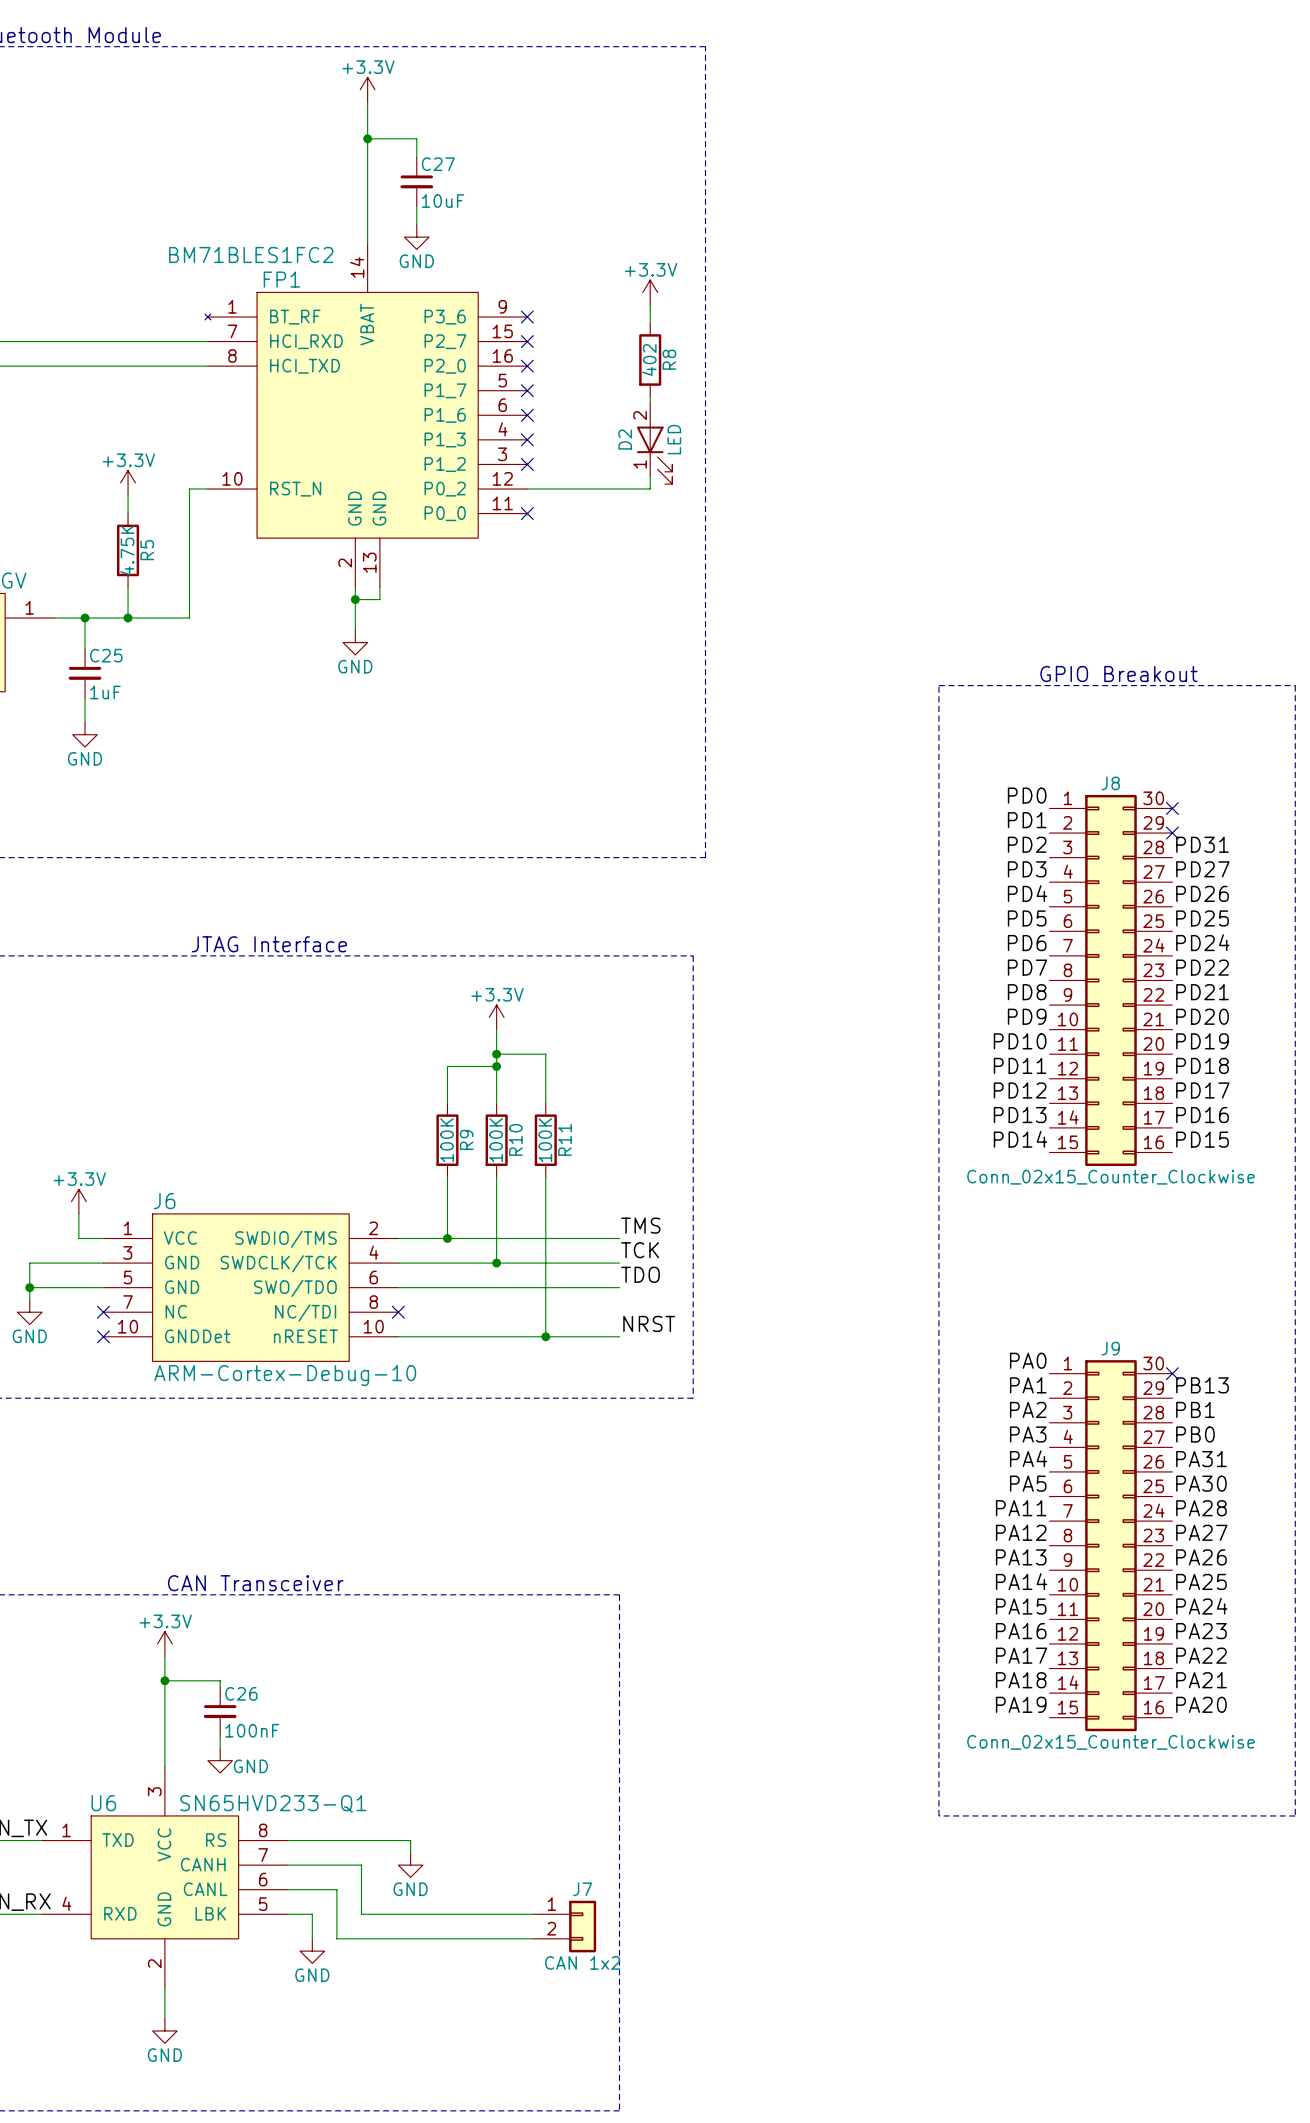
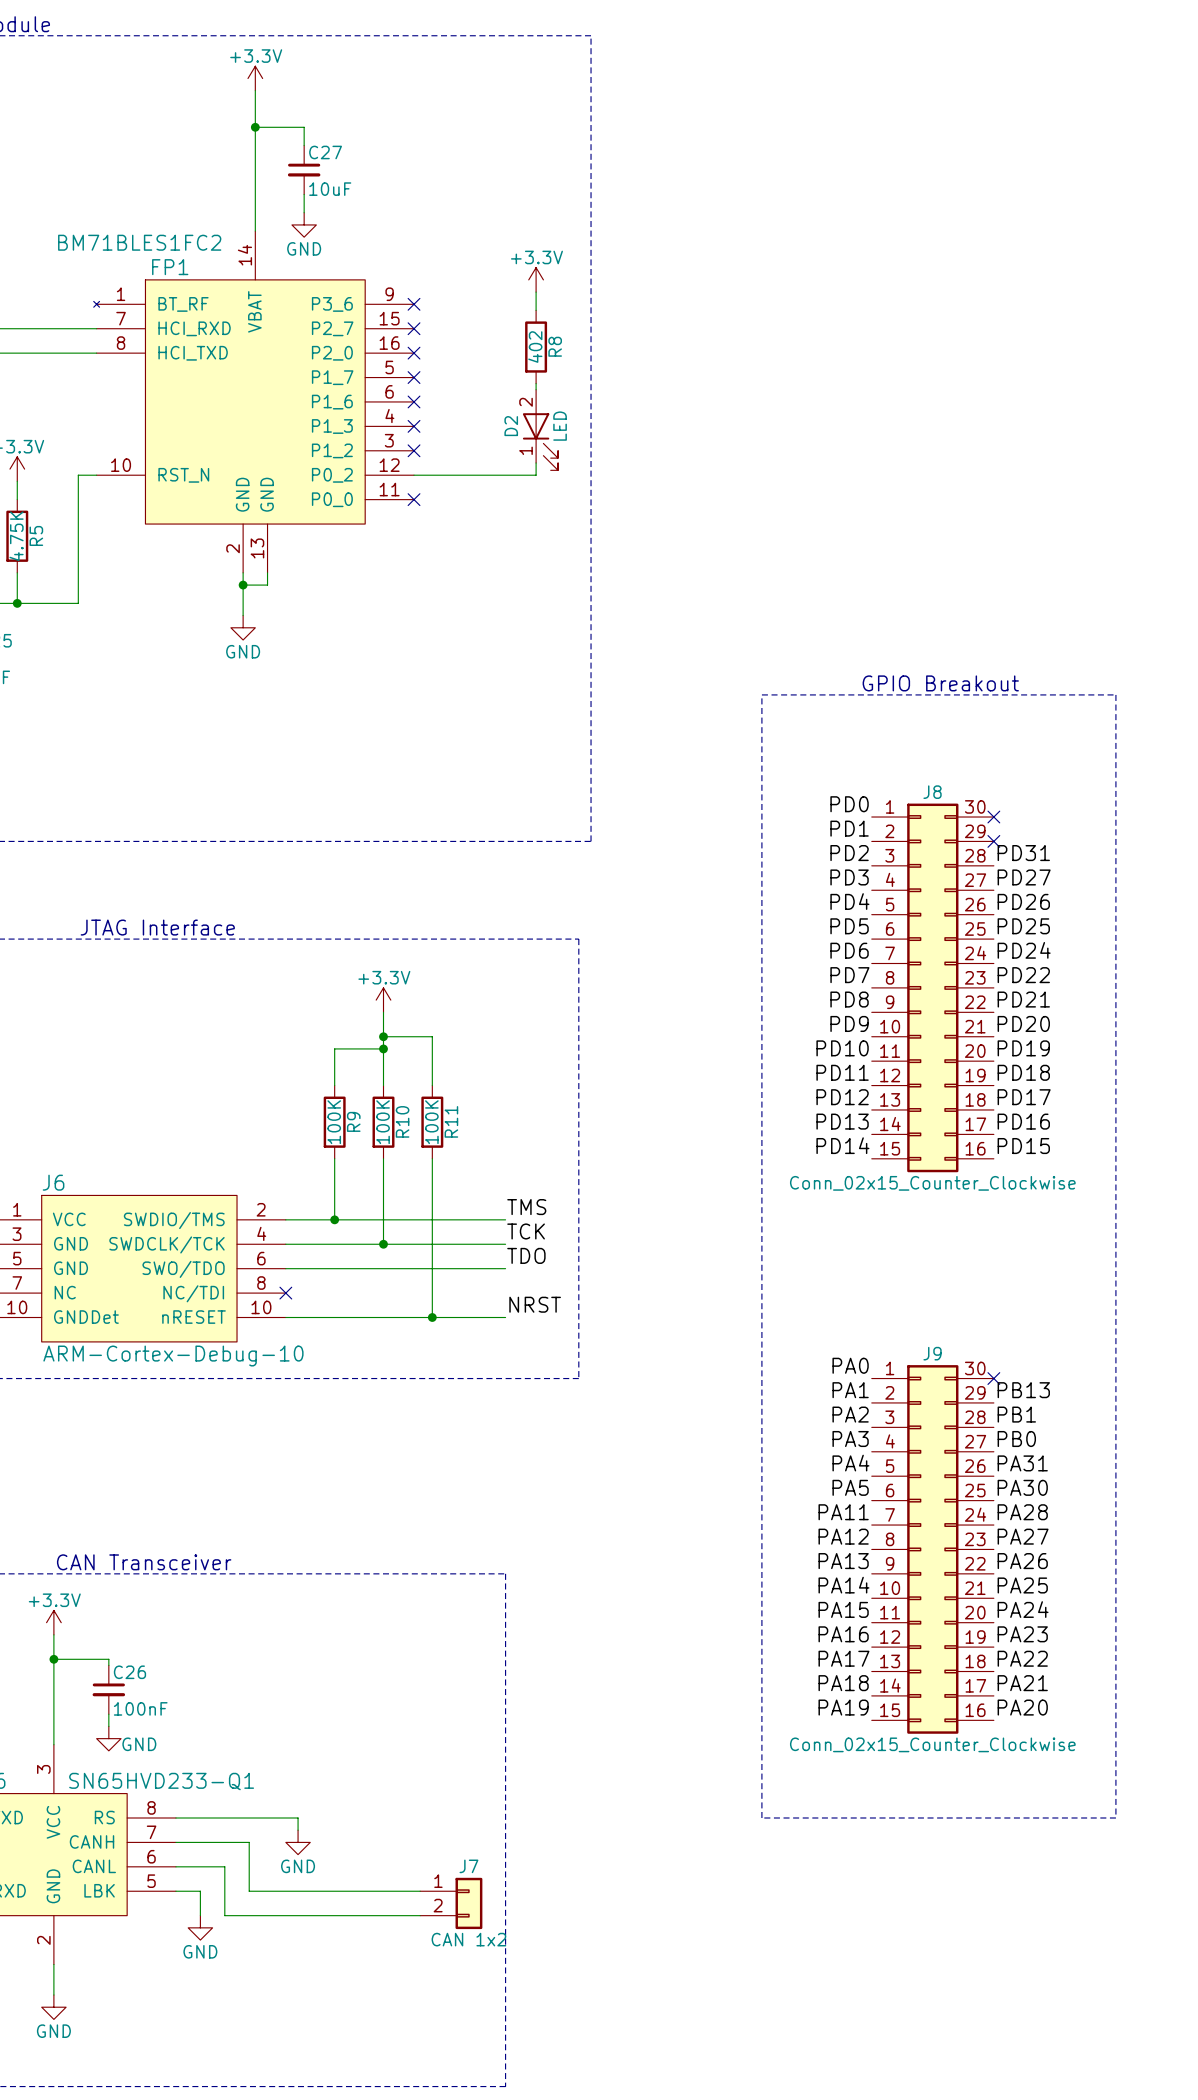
text position: GPIO Breakout (1118, 673) -> GPIO Breakout (940, 683)
line: (938, 685) (1295, 685) (1295, 1815) (938, 1815) (938, 685) -> (761, 694) (1115, 694) (1115, 1818) (761, 1818) (761, 694)
label position: PD0 (1027, 795) -> PD0 (849, 804)
no-connect mark: (1172, 808) -> none
label position: PD1 (1027, 820) -> PD1 (849, 828)
no-connect mark: none -> (993, 817)
no-connect mark: (1172, 833) -> none
label position: PD2 (1027, 844) -> PD2 (849, 853)
label position: PD31 (1202, 844) -> PD31 (1023, 853)
no-connect mark: none -> (993, 841)
label position: PD3 (1027, 869) -> PD3 (849, 877)
label position: PD27 (1202, 869) -> PD27 (1024, 877)
label position: PD4 (1027, 893) -> PD4 (849, 901)
label position: PD26 (1202, 893) -> PD26 (1023, 901)
label position: PD5 (1027, 918) -> PD5 (849, 926)
label position: PD25 (1202, 918) -> PD25 (1023, 926)
label position: PD24 (1202, 942) -> PD24 (1024, 950)
label position: PD6 (1027, 943) -> PD6 (849, 950)
label position: PD7 (1027, 967) -> PD7 (849, 975)
label position: PD22 (1202, 967) -> PD22 (1023, 975)
J8 position: (1110, 980) -> (932, 987)
label position: PD8 (1027, 992) -> PD8 (849, 999)
label position: PD21 (1202, 992) -> PD21 (1023, 999)
label position: PD9 (1027, 1016) -> PD9 (849, 1023)
label position: PD20 (1202, 1016) -> PD20 (1023, 1023)
label position: PD10 (1020, 1041) -> PD10 (842, 1048)
label position: PD19 (1202, 1041) -> PD19 (1023, 1048)
label position: PD11 (1020, 1065) -> PD11 (842, 1072)
label position: PD18 (1202, 1065) -> PD18 (1023, 1072)
label position: PD12 (1020, 1090) -> PD12 (842, 1097)
label position: PD17 (1202, 1090) -> PD17 (1024, 1097)
label position: PD13 (1020, 1115) -> PD13 (842, 1121)
label position: PD16 (1202, 1115) -> PD16 (1023, 1121)
label position: PD14 (1020, 1139) -> PD14 (842, 1145)
label position: PD15 (1202, 1139) -> PD15 (1023, 1146)
label position: PA0 (1028, 1360) -> PA0 (850, 1365)
no-connect mark: (1172, 1373) -> none
label position: PA1 (1028, 1385) -> PA1 (850, 1390)
label position: PB13 (1202, 1385) -> PB13 (1023, 1390)
no-connect mark: none -> (993, 1378)
label position: PA2 (1028, 1409) -> PA2 (850, 1414)
label position: PB1 (1195, 1409) -> PB1 (1016, 1414)
label position: PA3 (1028, 1434) -> PA3 (850, 1439)
label position: PB0 (1195, 1434) -> PB0 (1016, 1439)
label position: PA4 (1028, 1458) -> PA4 (850, 1463)
label position: PA31 (1201, 1459) -> PA31 (1022, 1463)
label position: PA5 (1028, 1483) -> PA5 (850, 1487)
label position: PA30 (1201, 1483) -> PA30 (1022, 1487)
label position: PA11 (1021, 1508) -> PA11 (843, 1512)
label position: PA28 (1201, 1508) -> PA28 (1022, 1512)
label position: PA12 (1021, 1532) -> PA12 (843, 1536)
label position: PA27 (1201, 1532) -> PA27 (1023, 1536)
J9 position: (1110, 1545) -> (932, 1549)
label position: PA13 (1021, 1557) -> PA13 (843, 1561)
label position: PA26 (1201, 1557) -> PA26 (1022, 1561)
label position: PA14 (1021, 1581) -> PA14 (843, 1585)
label position: PA25 (1201, 1581) -> PA25 (1022, 1585)
label position: PA15 (1021, 1606) -> PA15 (843, 1609)
label position: PA24 (1201, 1606) -> PA24 (1023, 1609)
label position: PA16 (1021, 1631) -> PA16 (843, 1634)
label position: PA23 (1201, 1631) -> PA23 (1022, 1634)
label position: PA17 (1021, 1655) -> PA17 (843, 1658)
label position: PA22 (1201, 1655) -> PA22 (1022, 1658)
label position: PA18 (1021, 1680) -> PA18 (843, 1683)
label position: PA21 (1201, 1680) -> PA21 (1022, 1683)
label position: PA19 (1021, 1704) -> PA19 (843, 1707)
label position: PA20 (1201, 1704) -> PA20 (1022, 1707)

